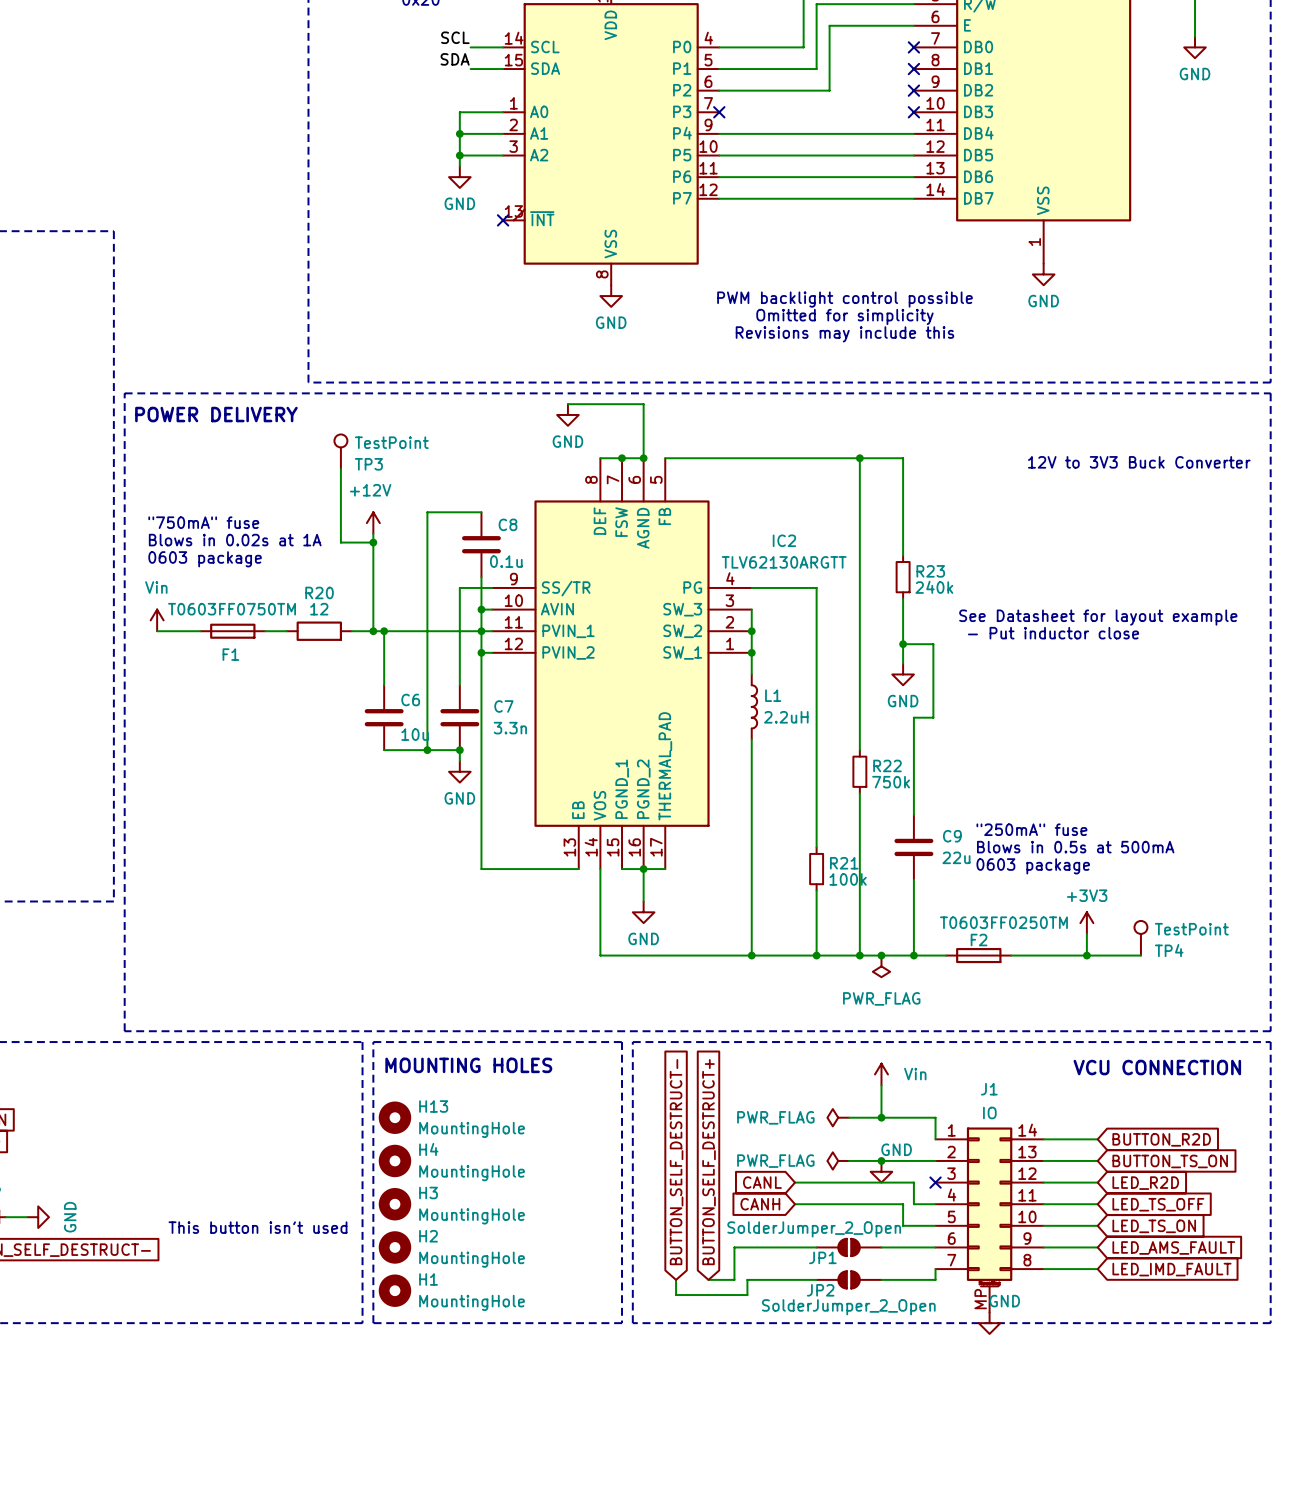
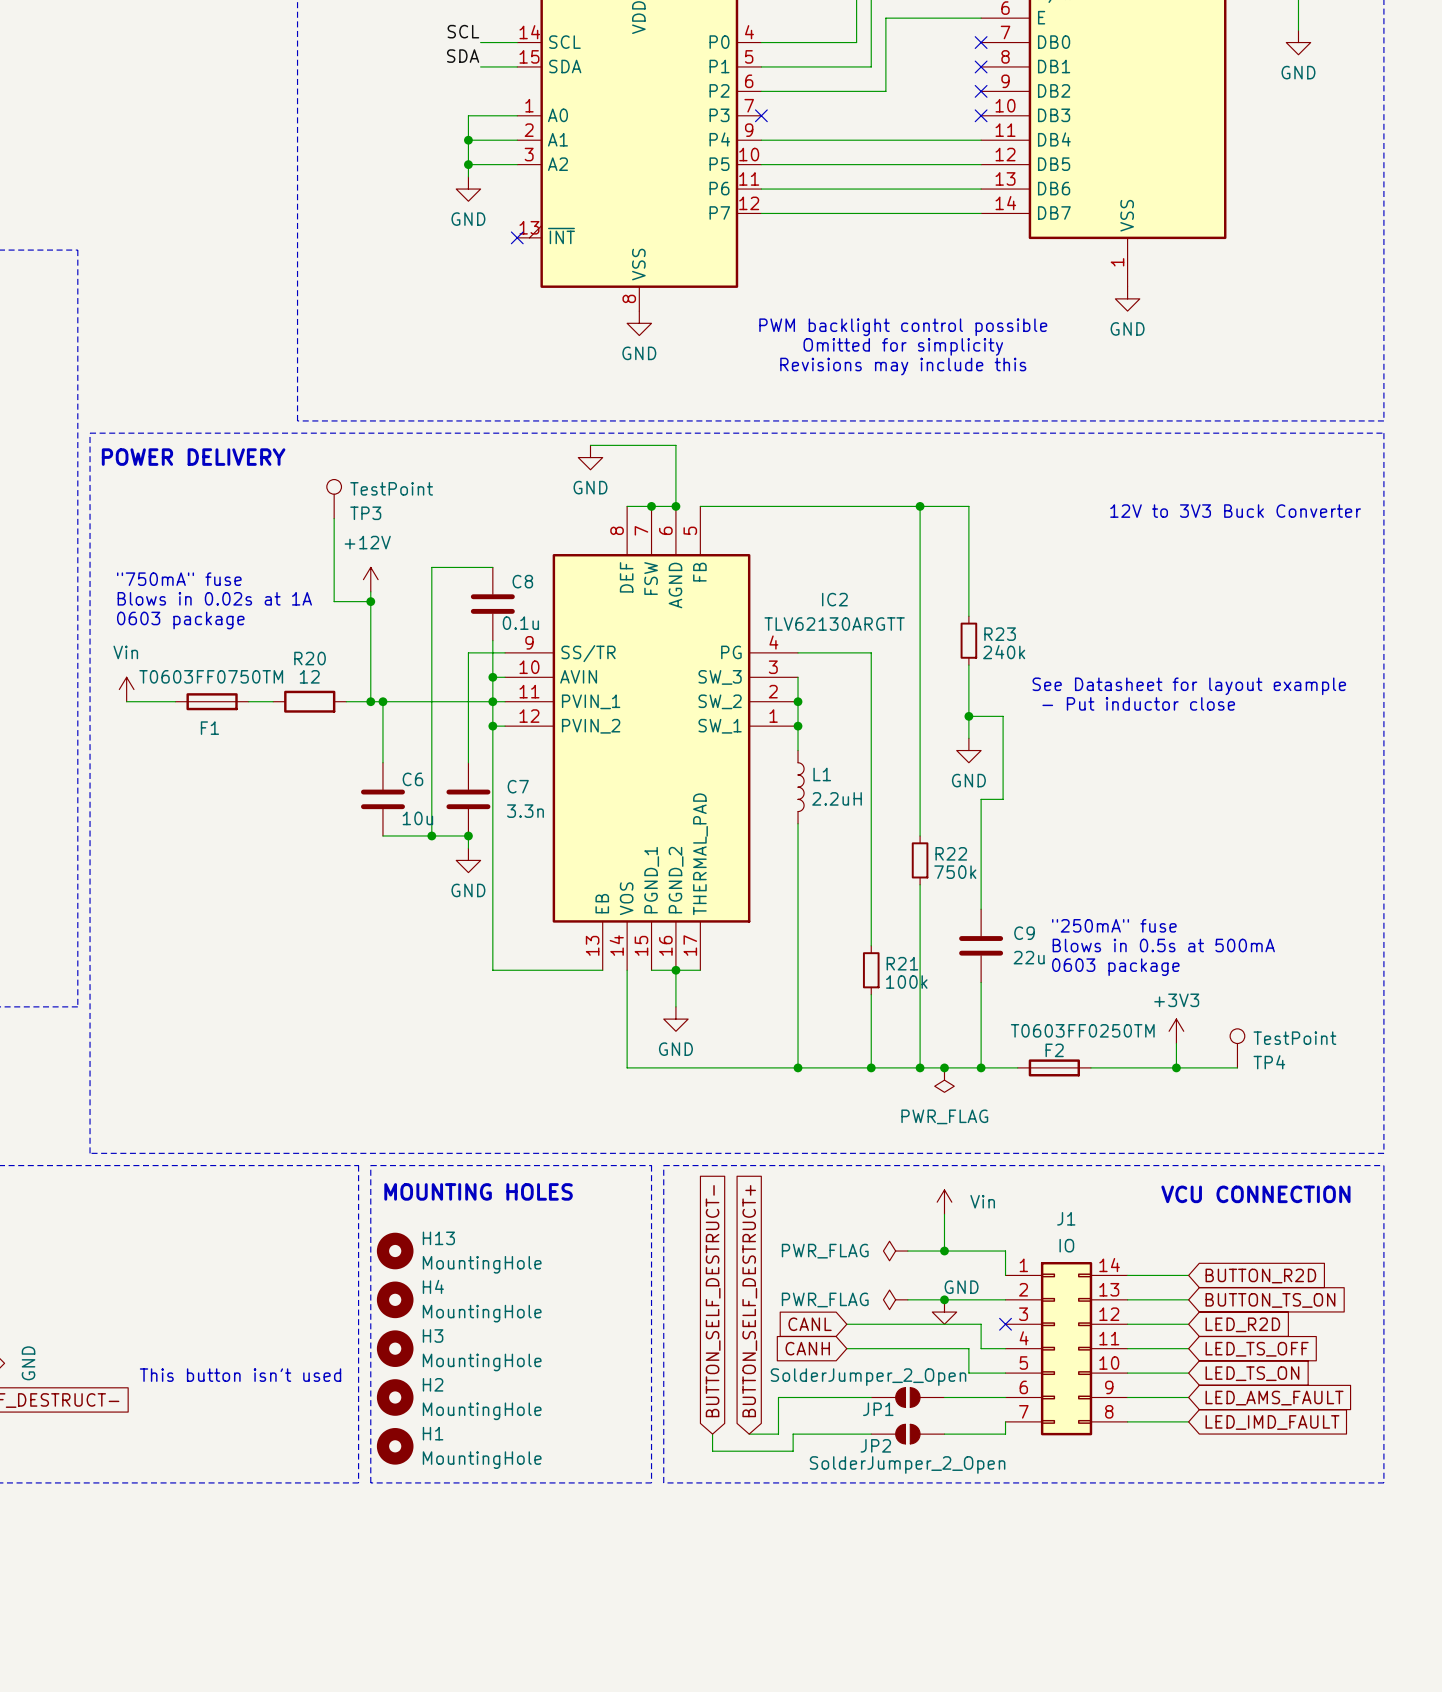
J1 symbol: [935, 1127, 1044, 1313] -> [1005, 1262, 1128, 1436]
power symbol: GND (989, 1323) -> none

